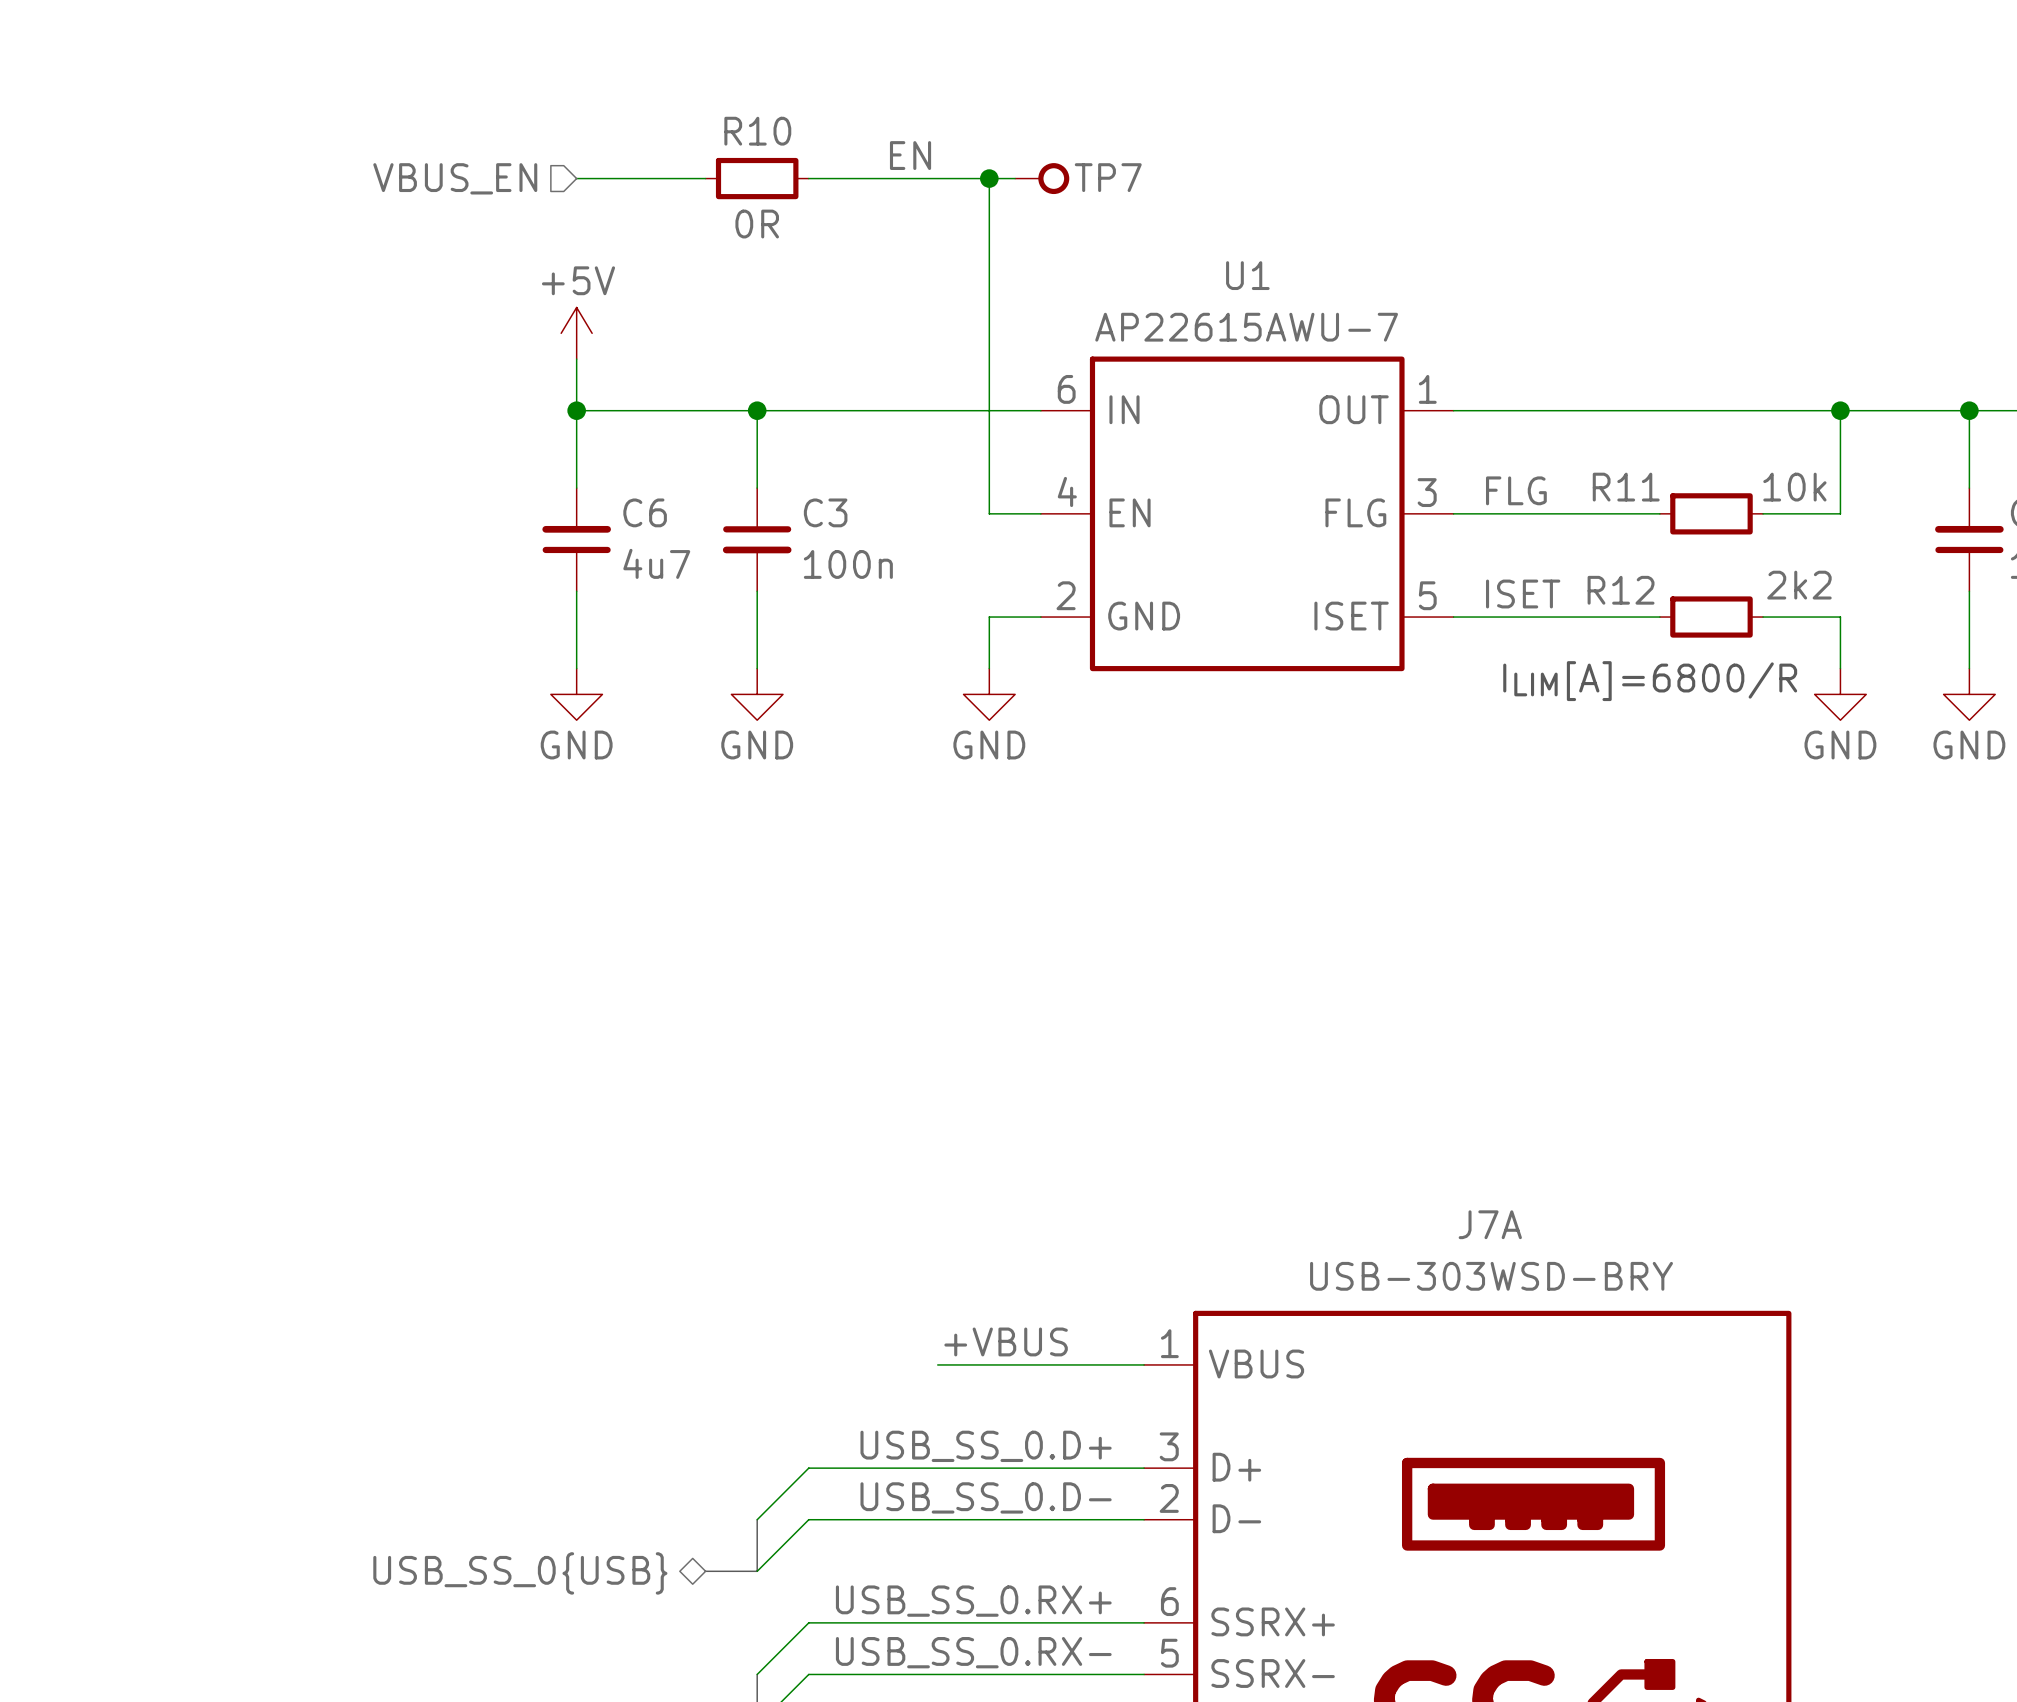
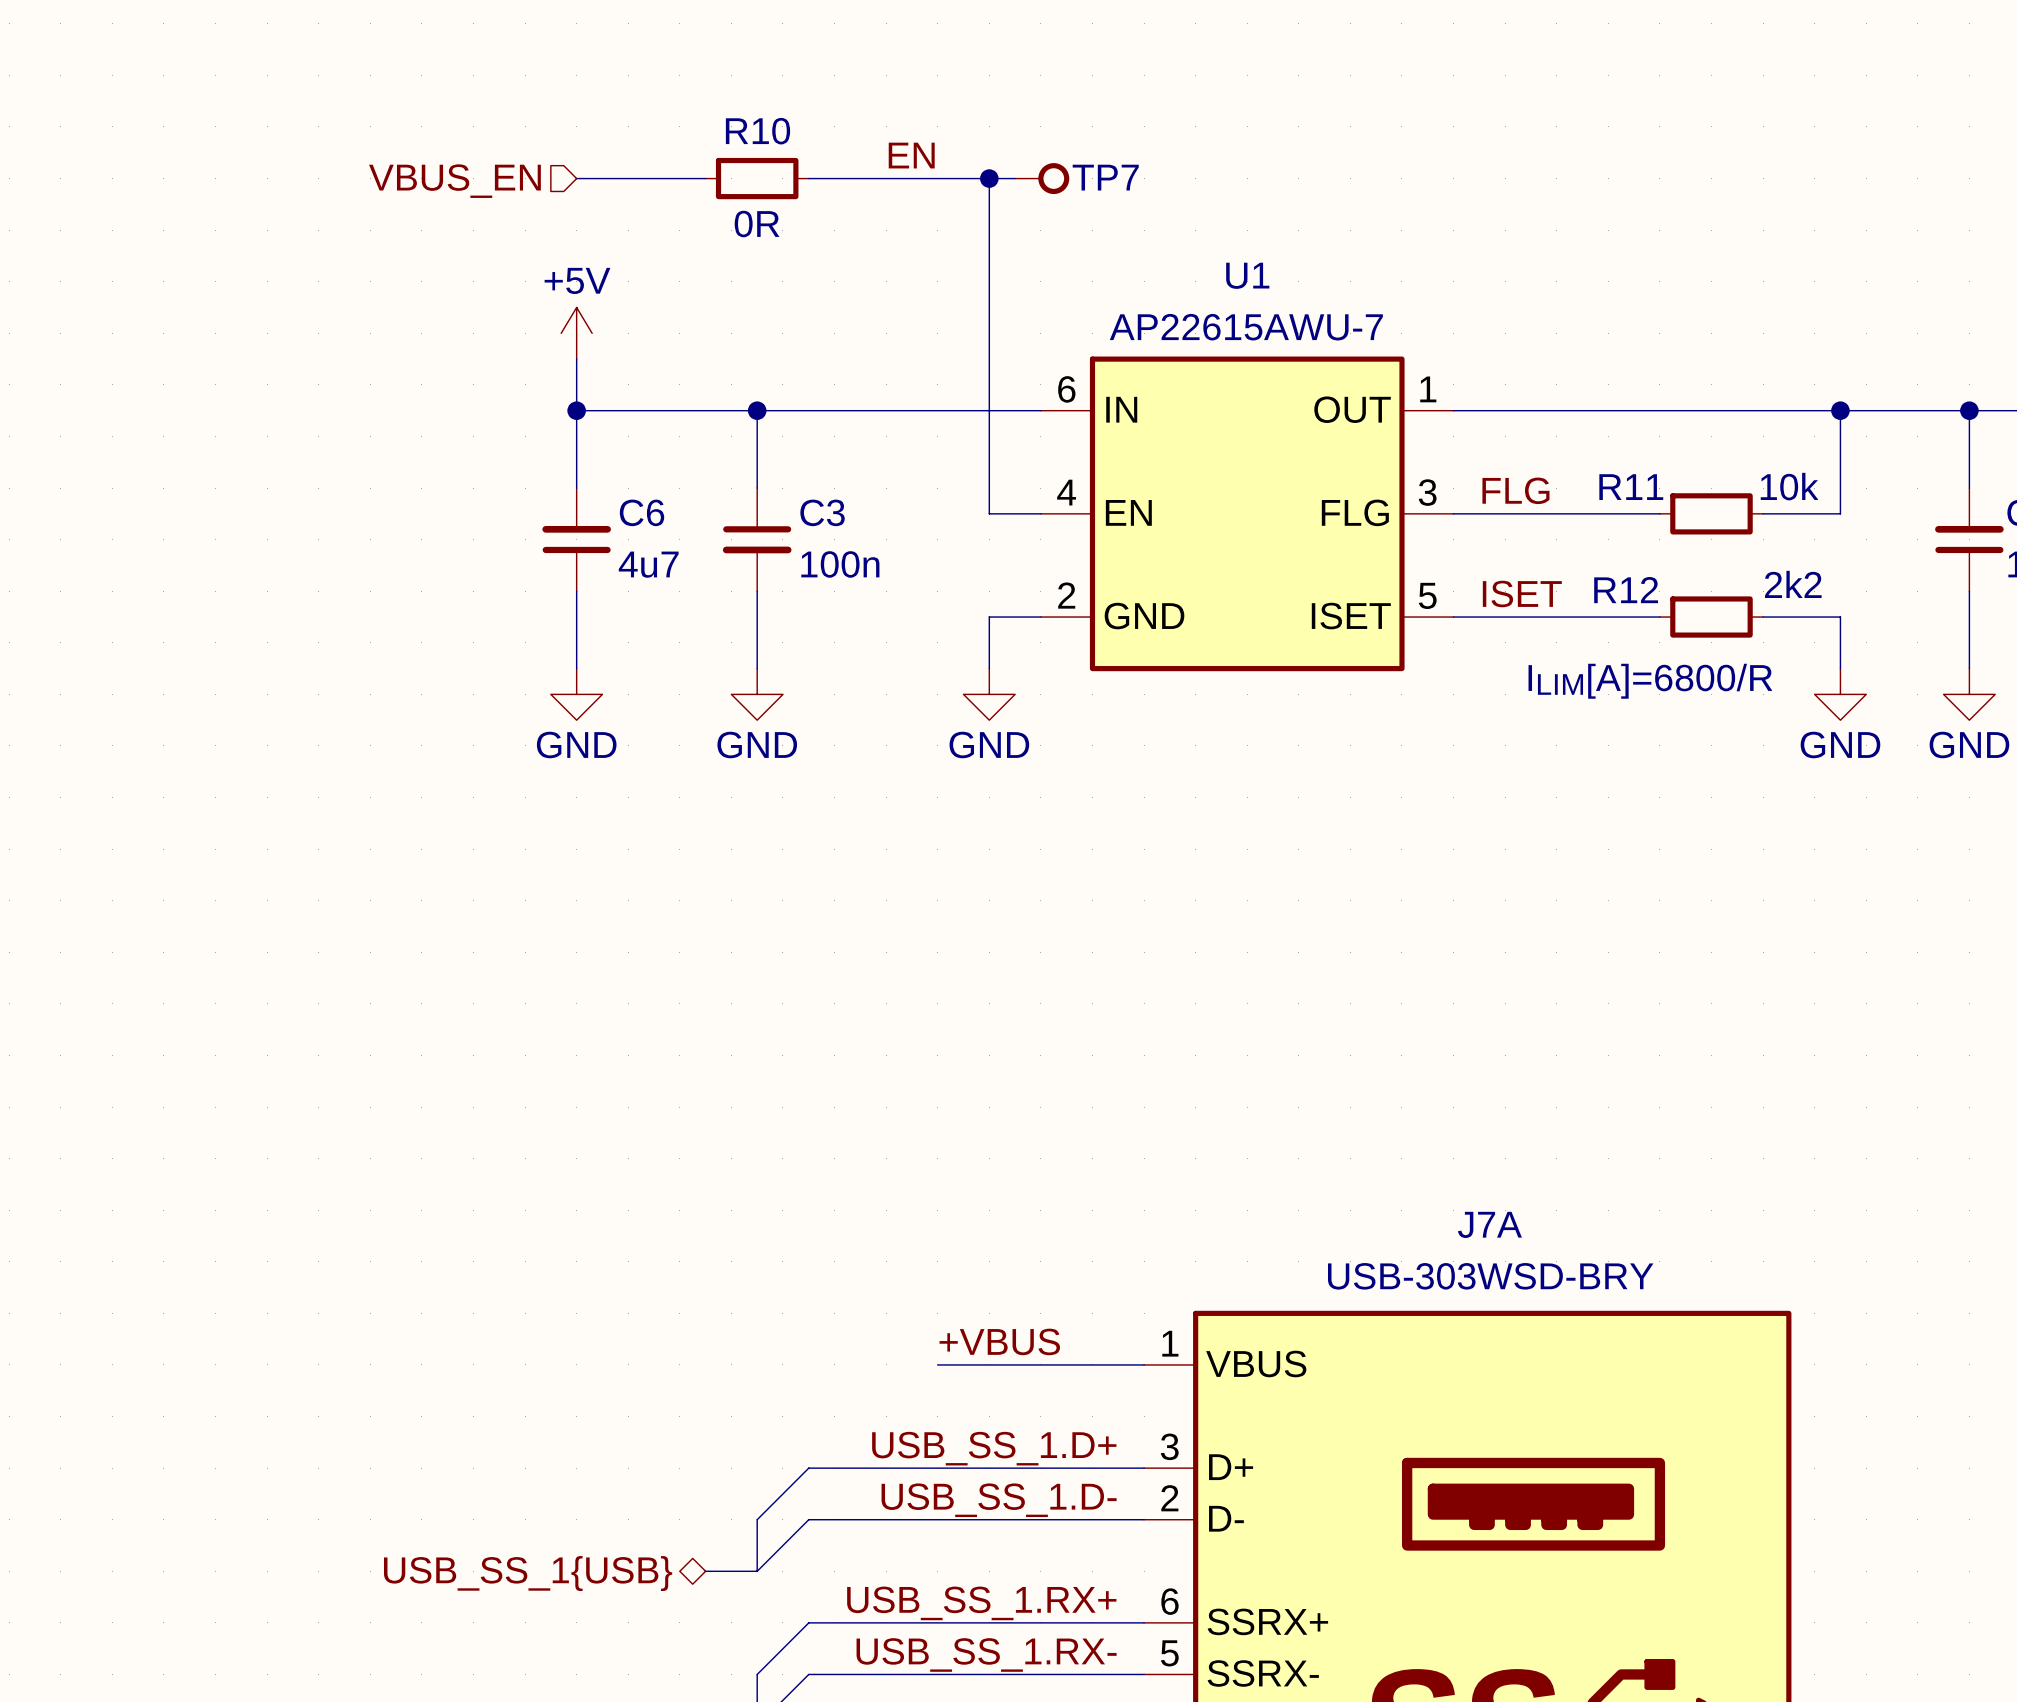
label: USB_SS_0.D+ (986, 1446) -> USB_SS_1.D+ (994, 1448)
label: USB_SS_0.D- (986, 1497) -> USB_SS_1.D- (999, 1500)
hierarchical label: USB_SS_0{USB} (520, 1573) -> USB_SS_1{USB} (528, 1573)
label: USB_SS_0.RX+ (973, 1601) -> USB_SS_1.RX+ (981, 1603)
label: USB_SS_0.RX- (973, 1652) -> USB_SS_1.RX- (986, 1654)

